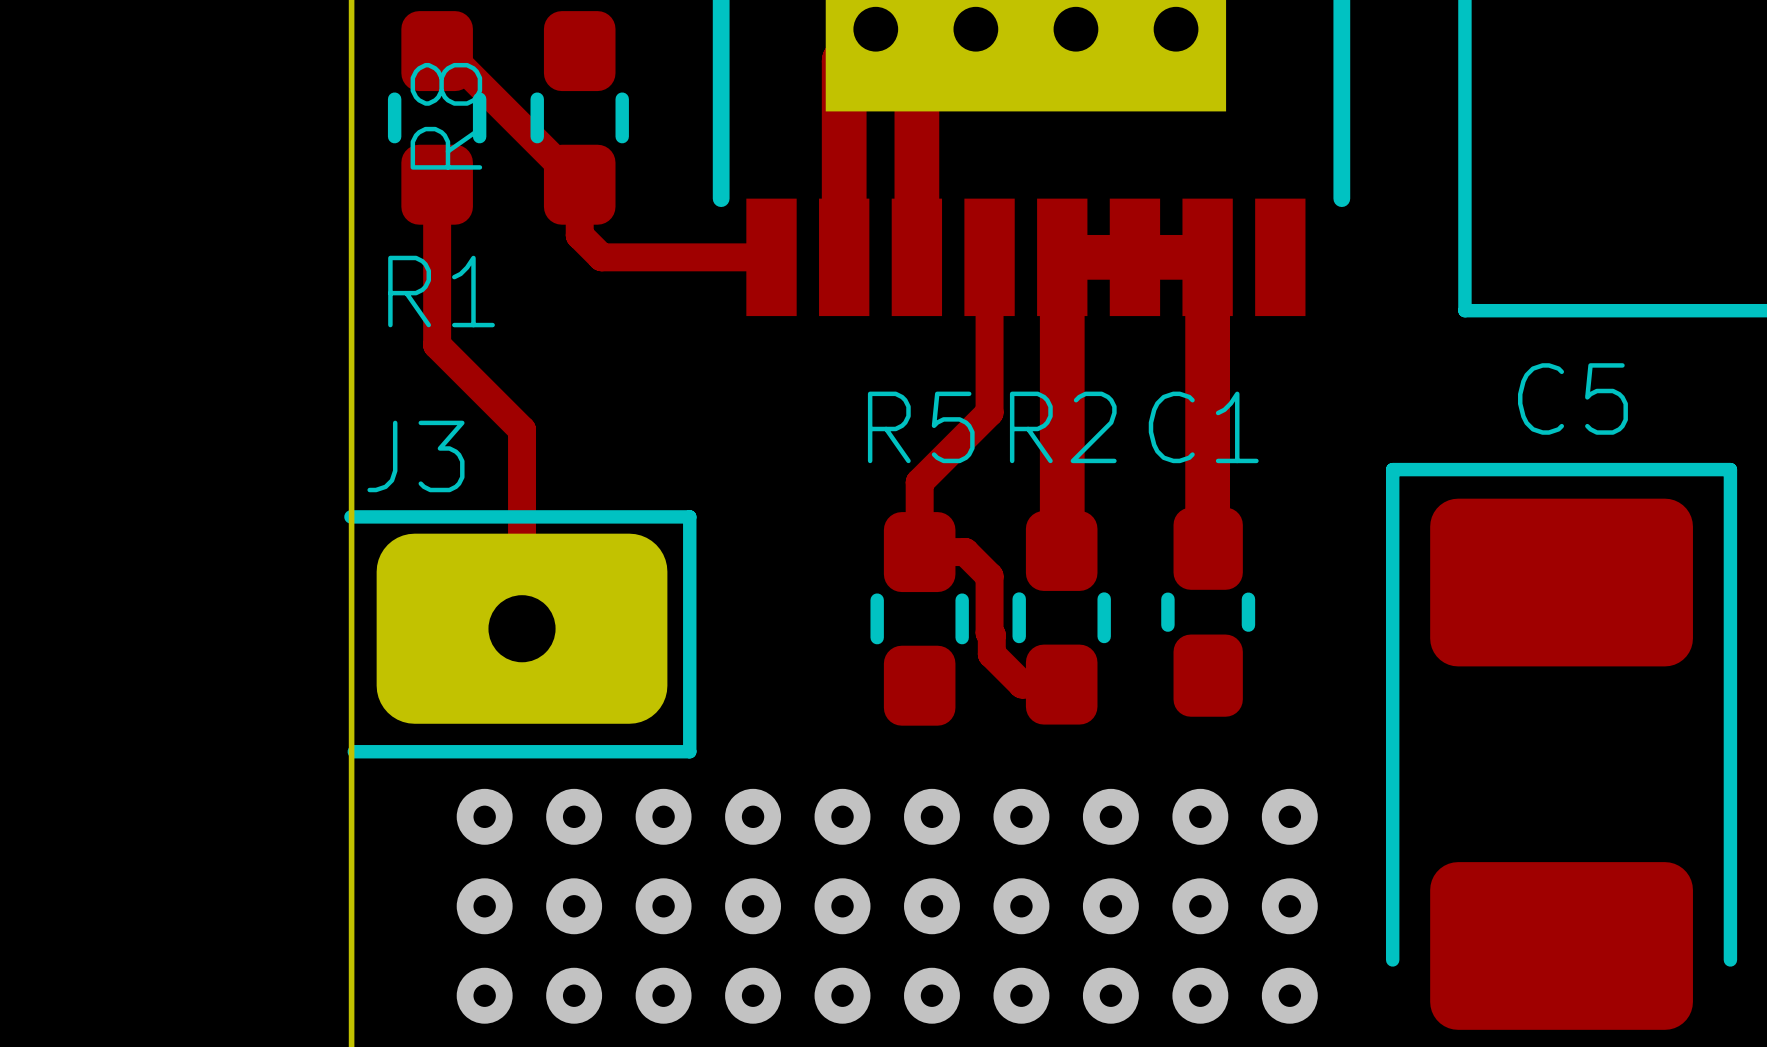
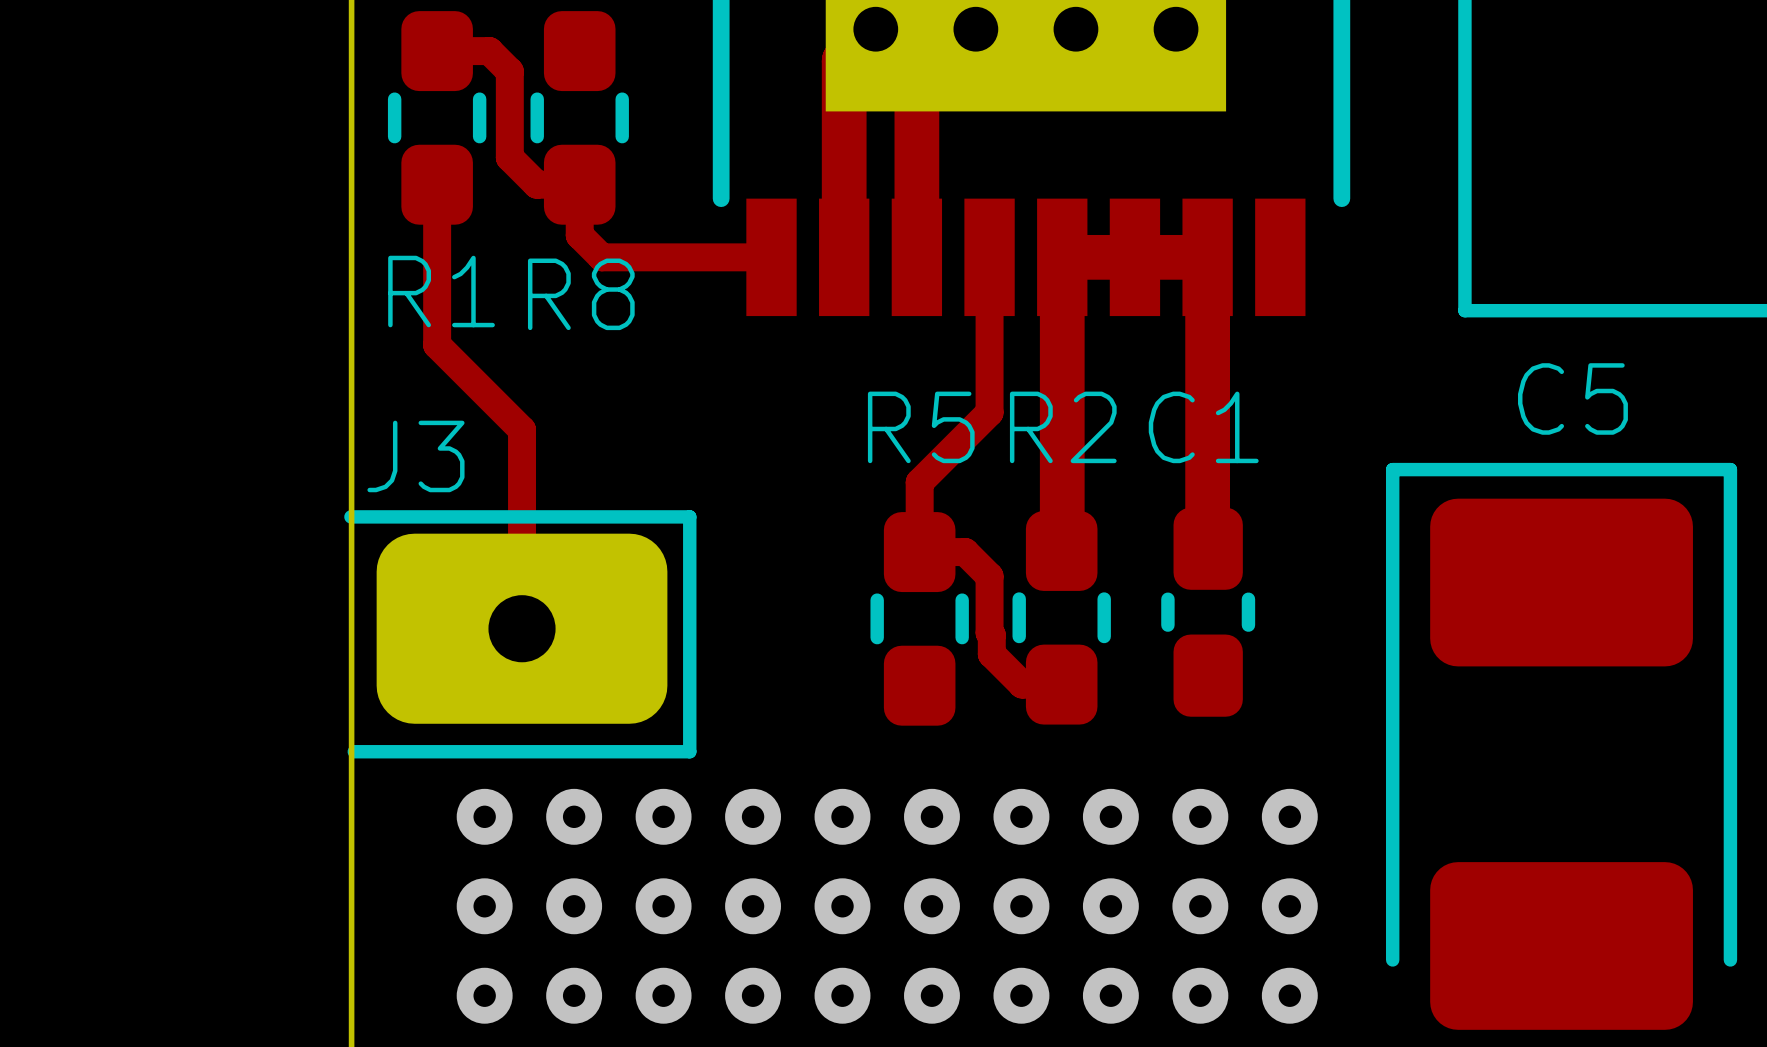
track: (446, 51) (579, 184) -> (446, 51) (489, 51) (509, 71) (509, 157) (536, 184) (581, 184)
R8 name rotation: 0° (446, 116) -> 90° clockwise (581, 294)
R8 name position: R8 (446, 116) -> R8 (581, 294)

